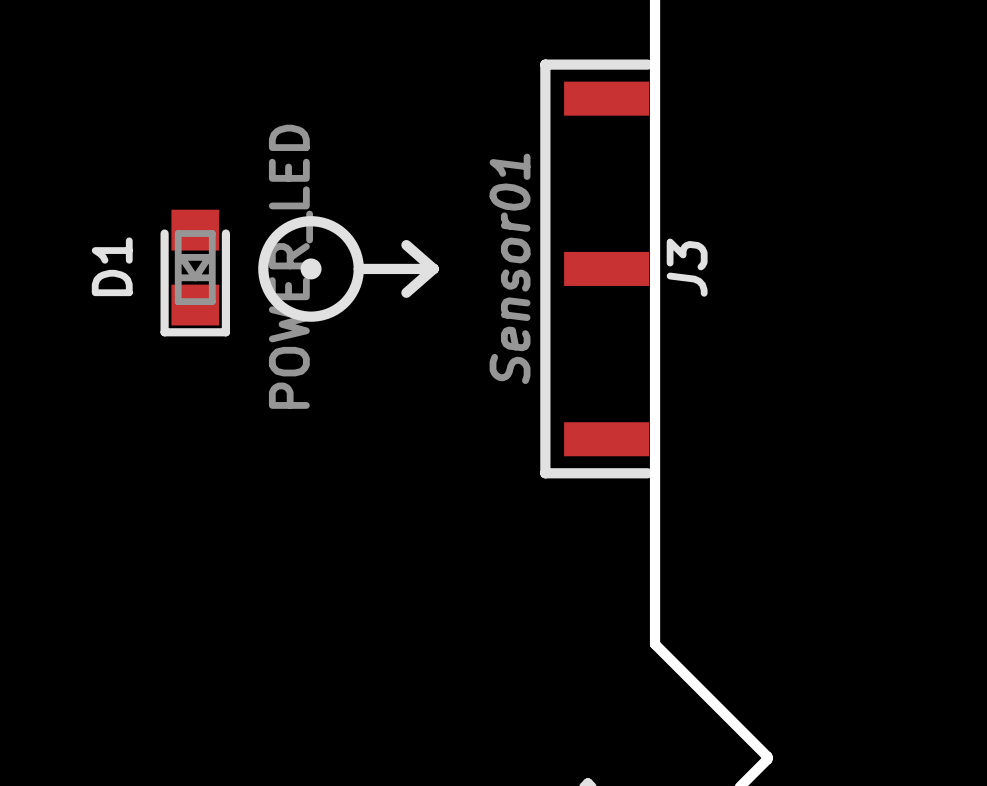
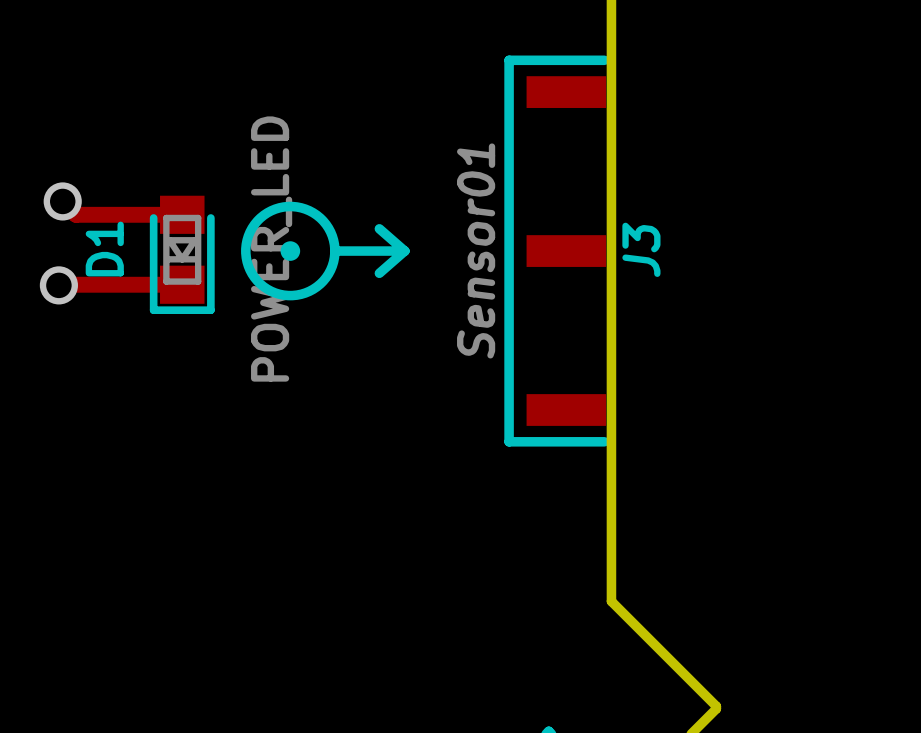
track: none -> (62, 201) (76, 214) (182, 214)
via: none -> (62, 201)
track: none -> (59, 284) (182, 284)
via: none -> (58, 285)

